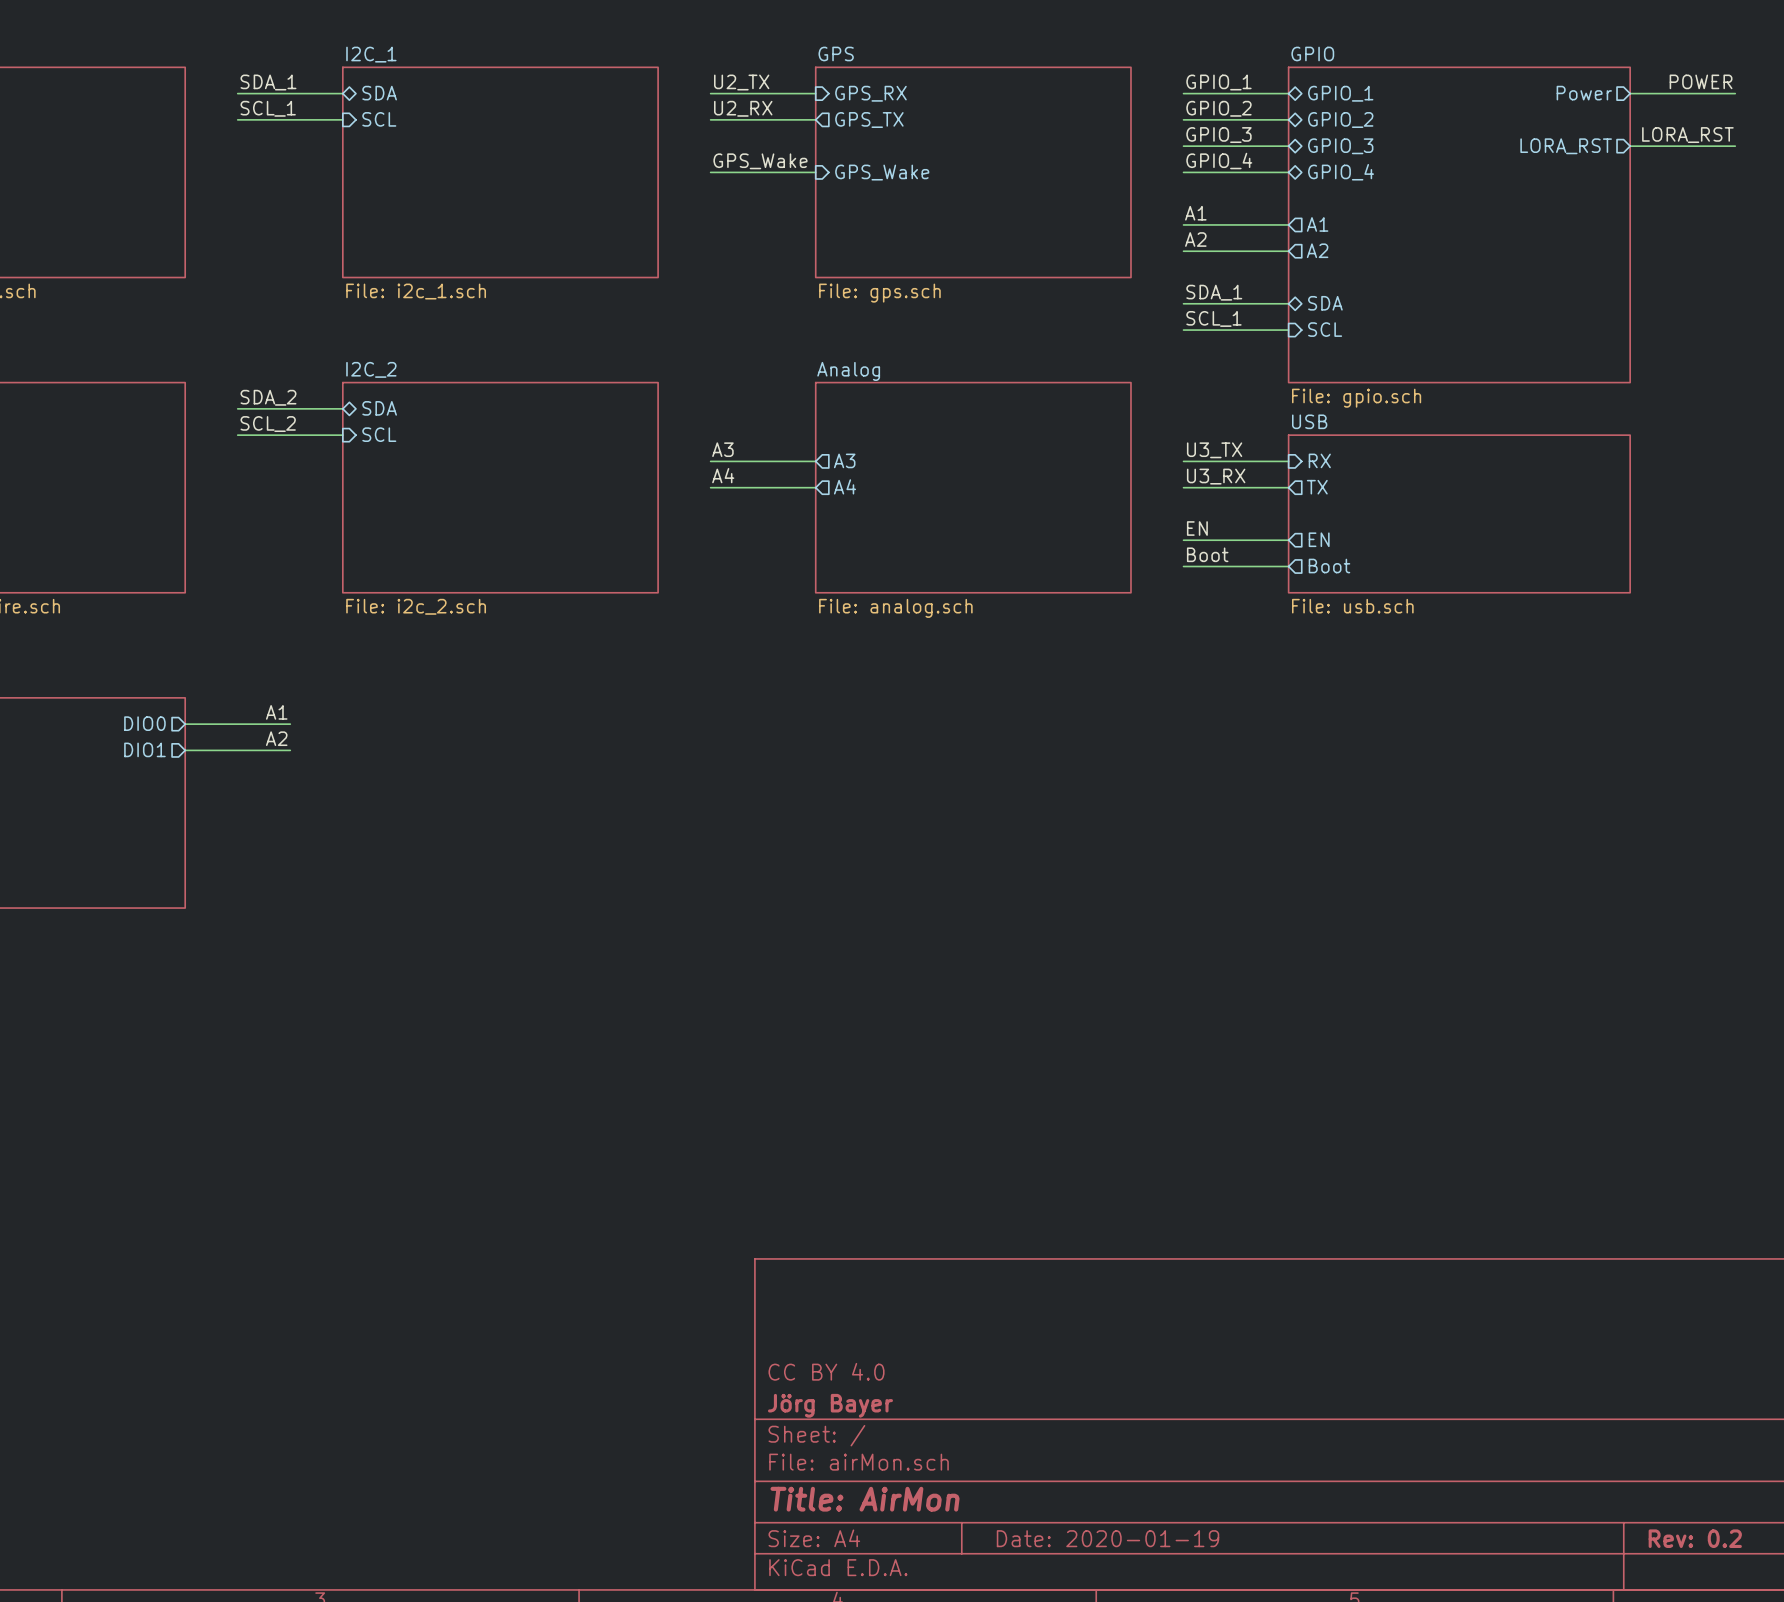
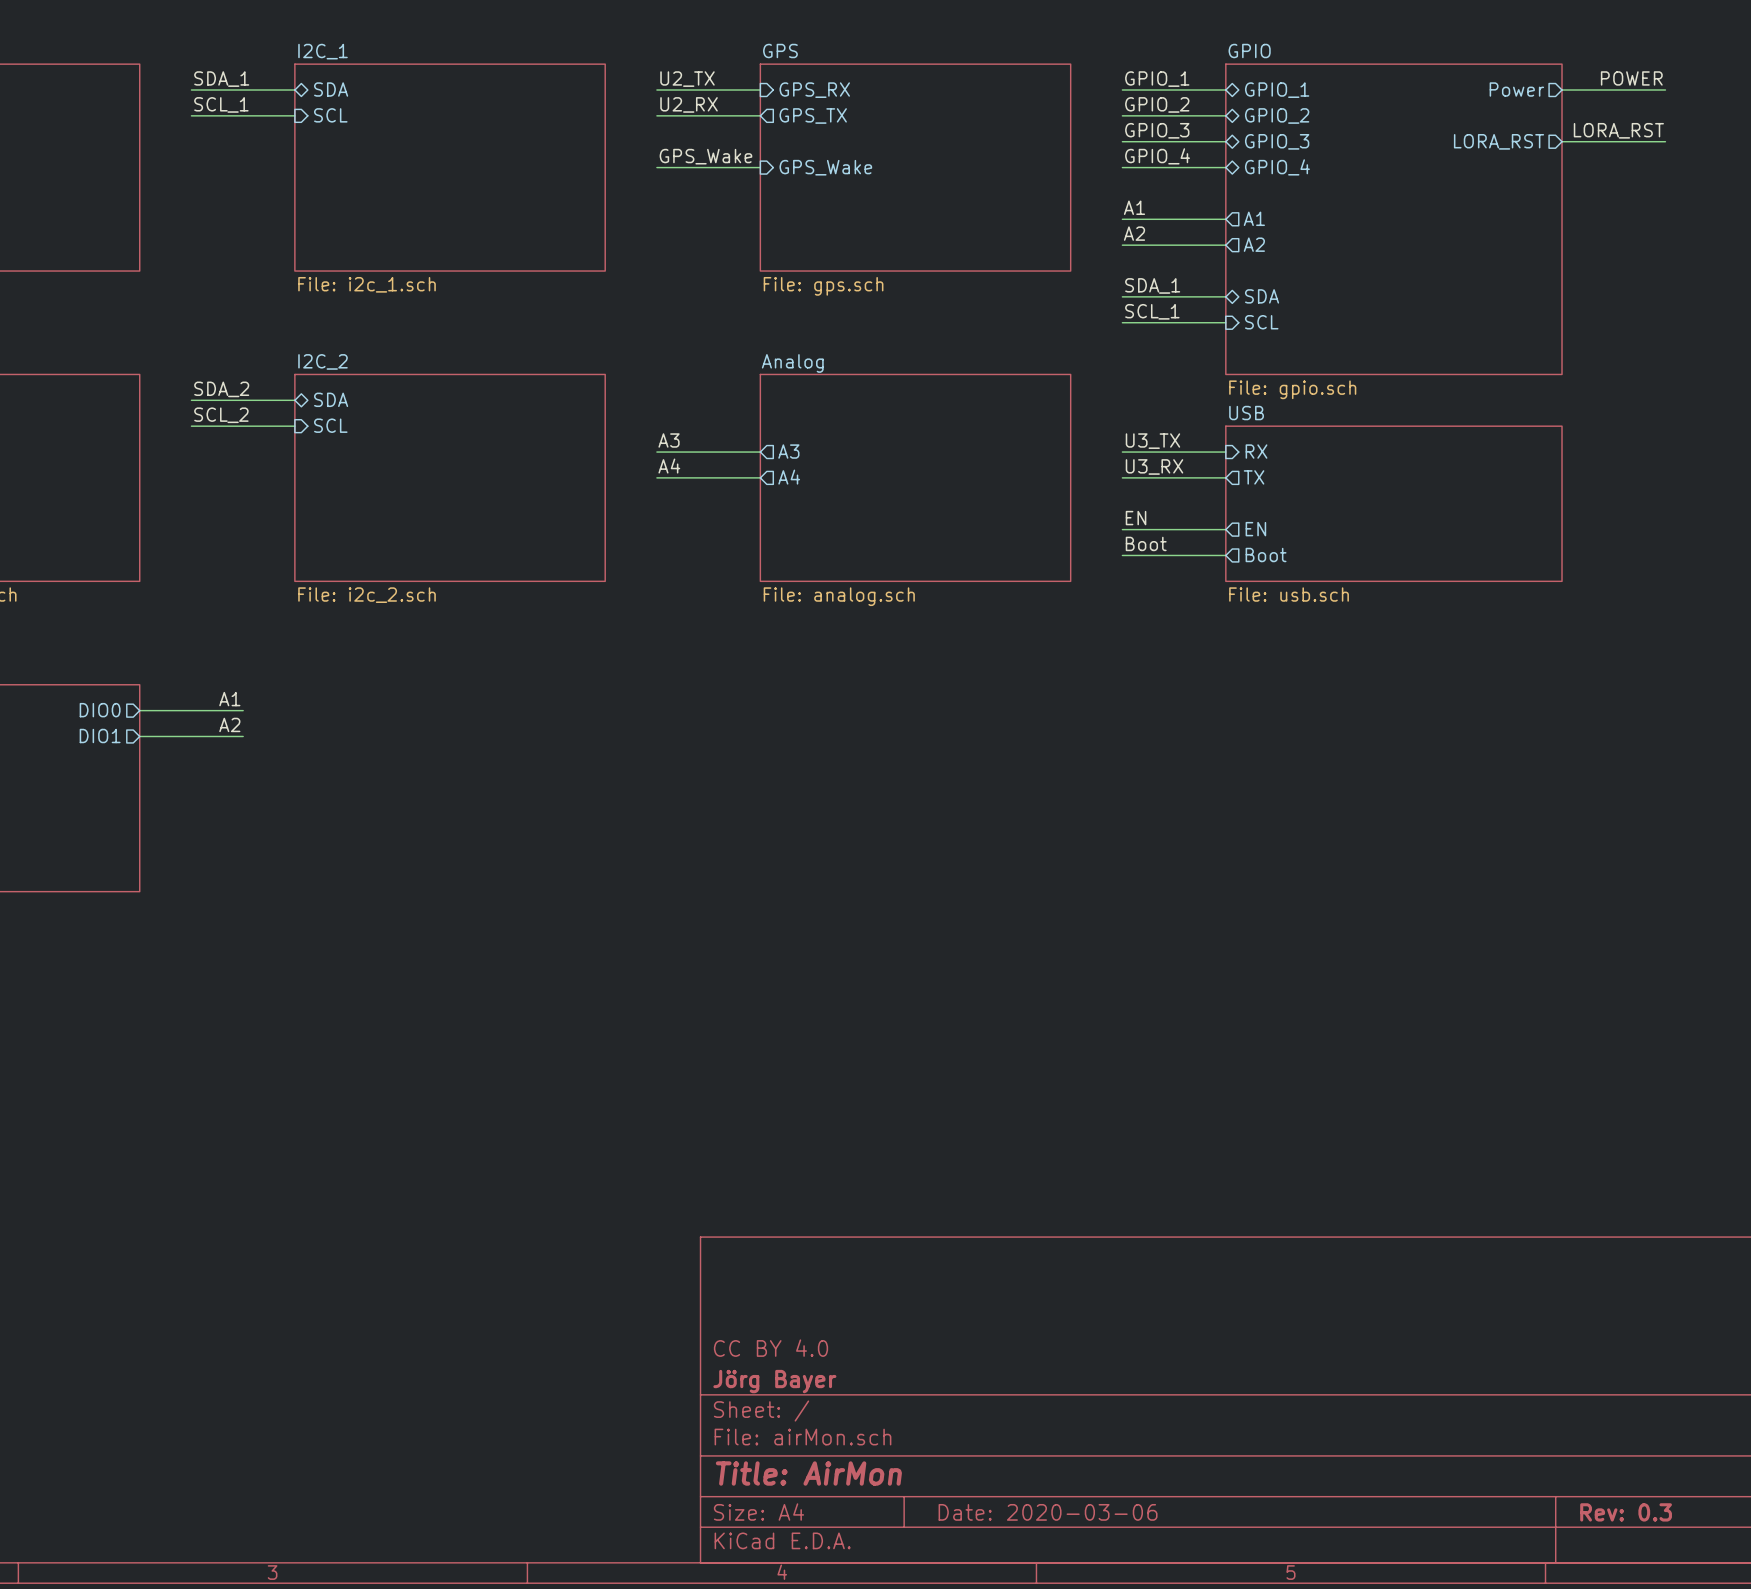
title block: Date: 2020-01-19 (1108, 1538) -> Date: 2020-03-06 (1048, 1512)
title block: Rev: 0.2 (1695, 1538) -> Rev: 0.3 (1626, 1512)

